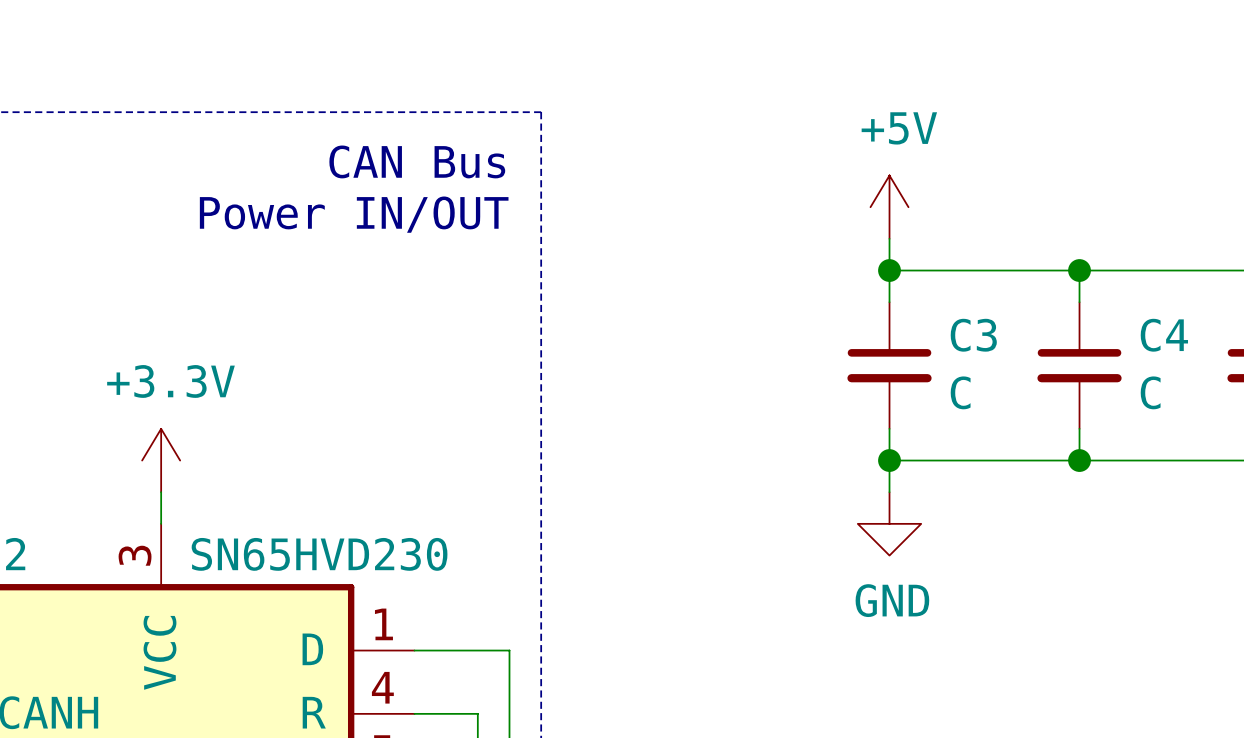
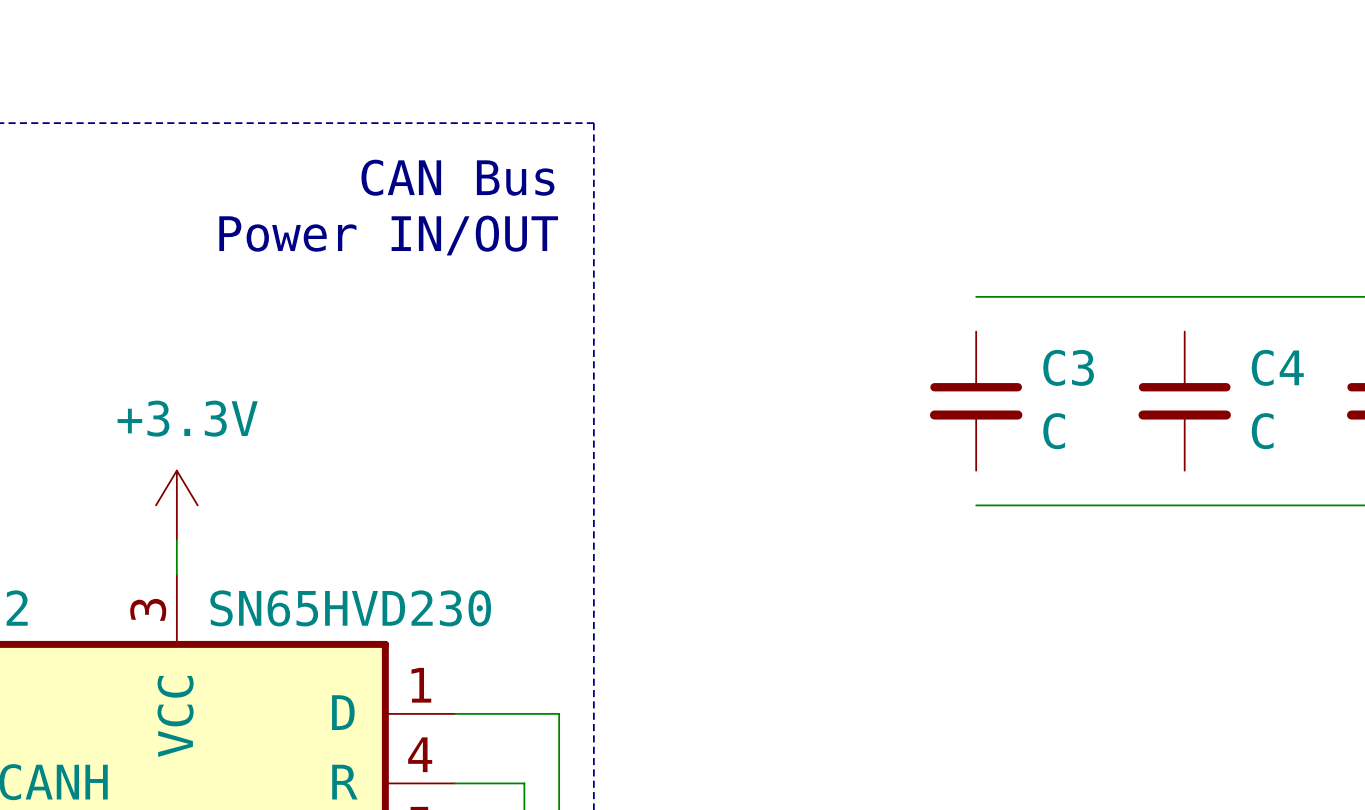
power symbol: +5V (889, 207) -> none
wire: (889, 238) (889, 302) -> none
junction: (889, 270) -> none
wire: (1079, 270) (1079, 302) -> none
junction: (1079, 270) -> none
wire: (889, 428) (889, 492) -> none
wire: (1079, 428) (1079, 460) -> none
junction: (889, 460) -> none
junction: (1079, 460) -> none
power symbol: GND (889, 523) -> none

